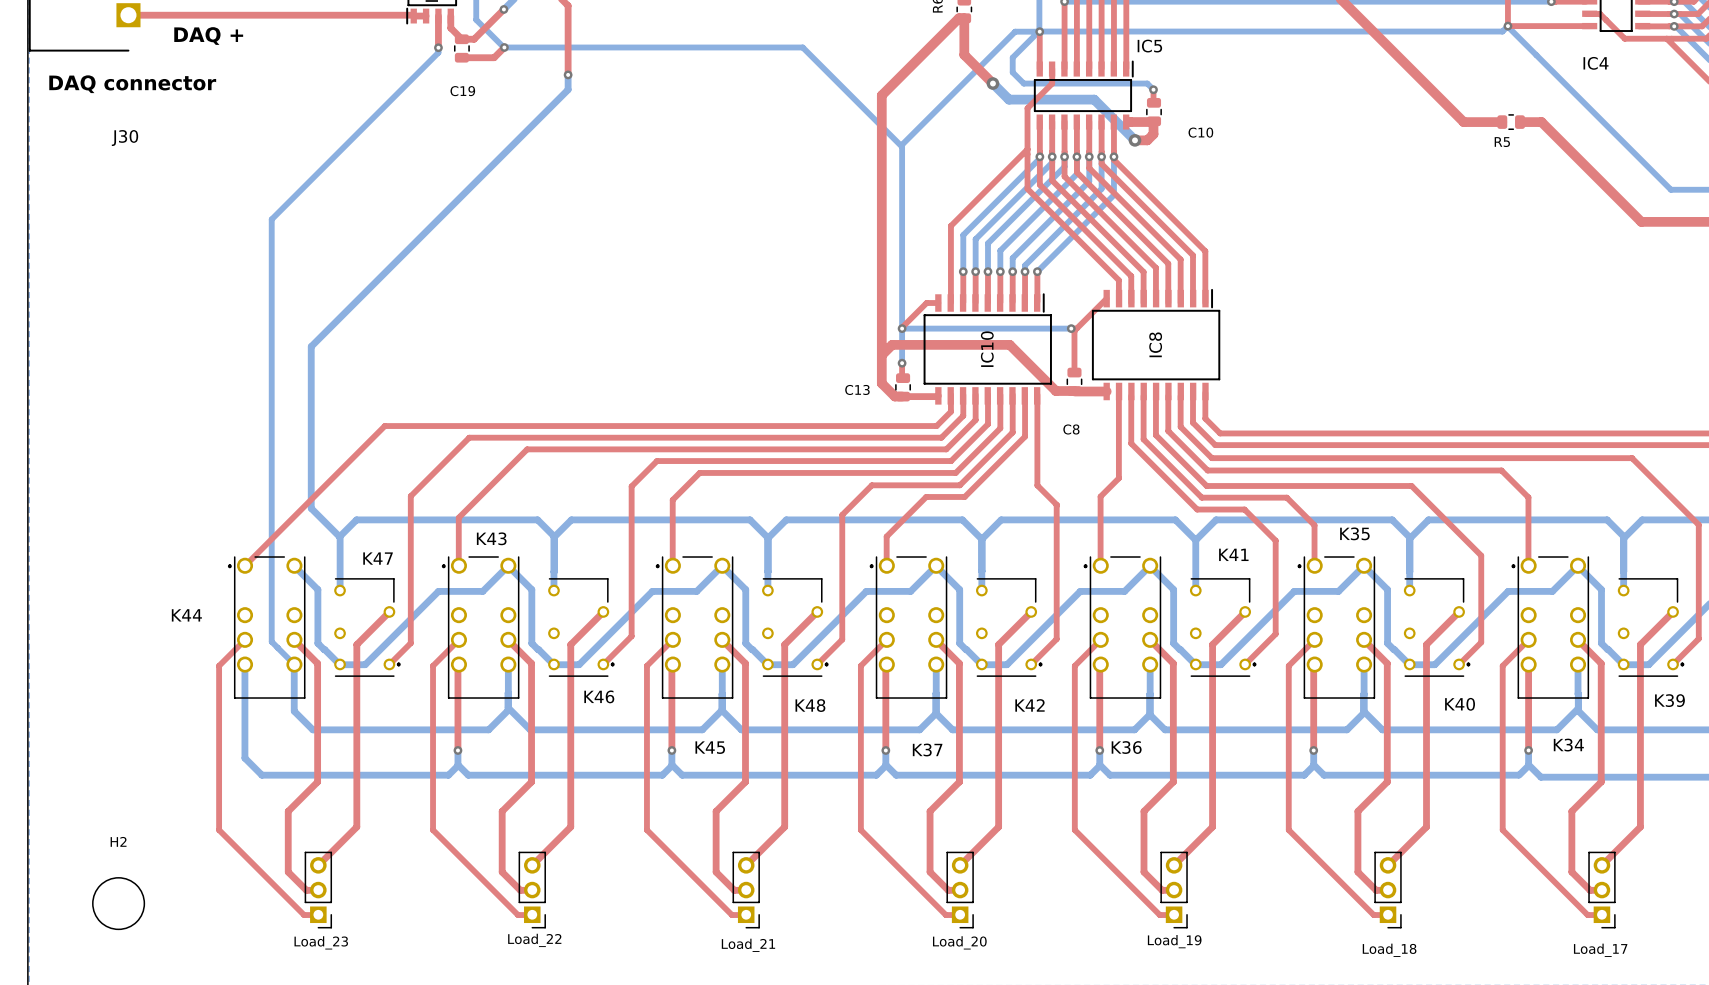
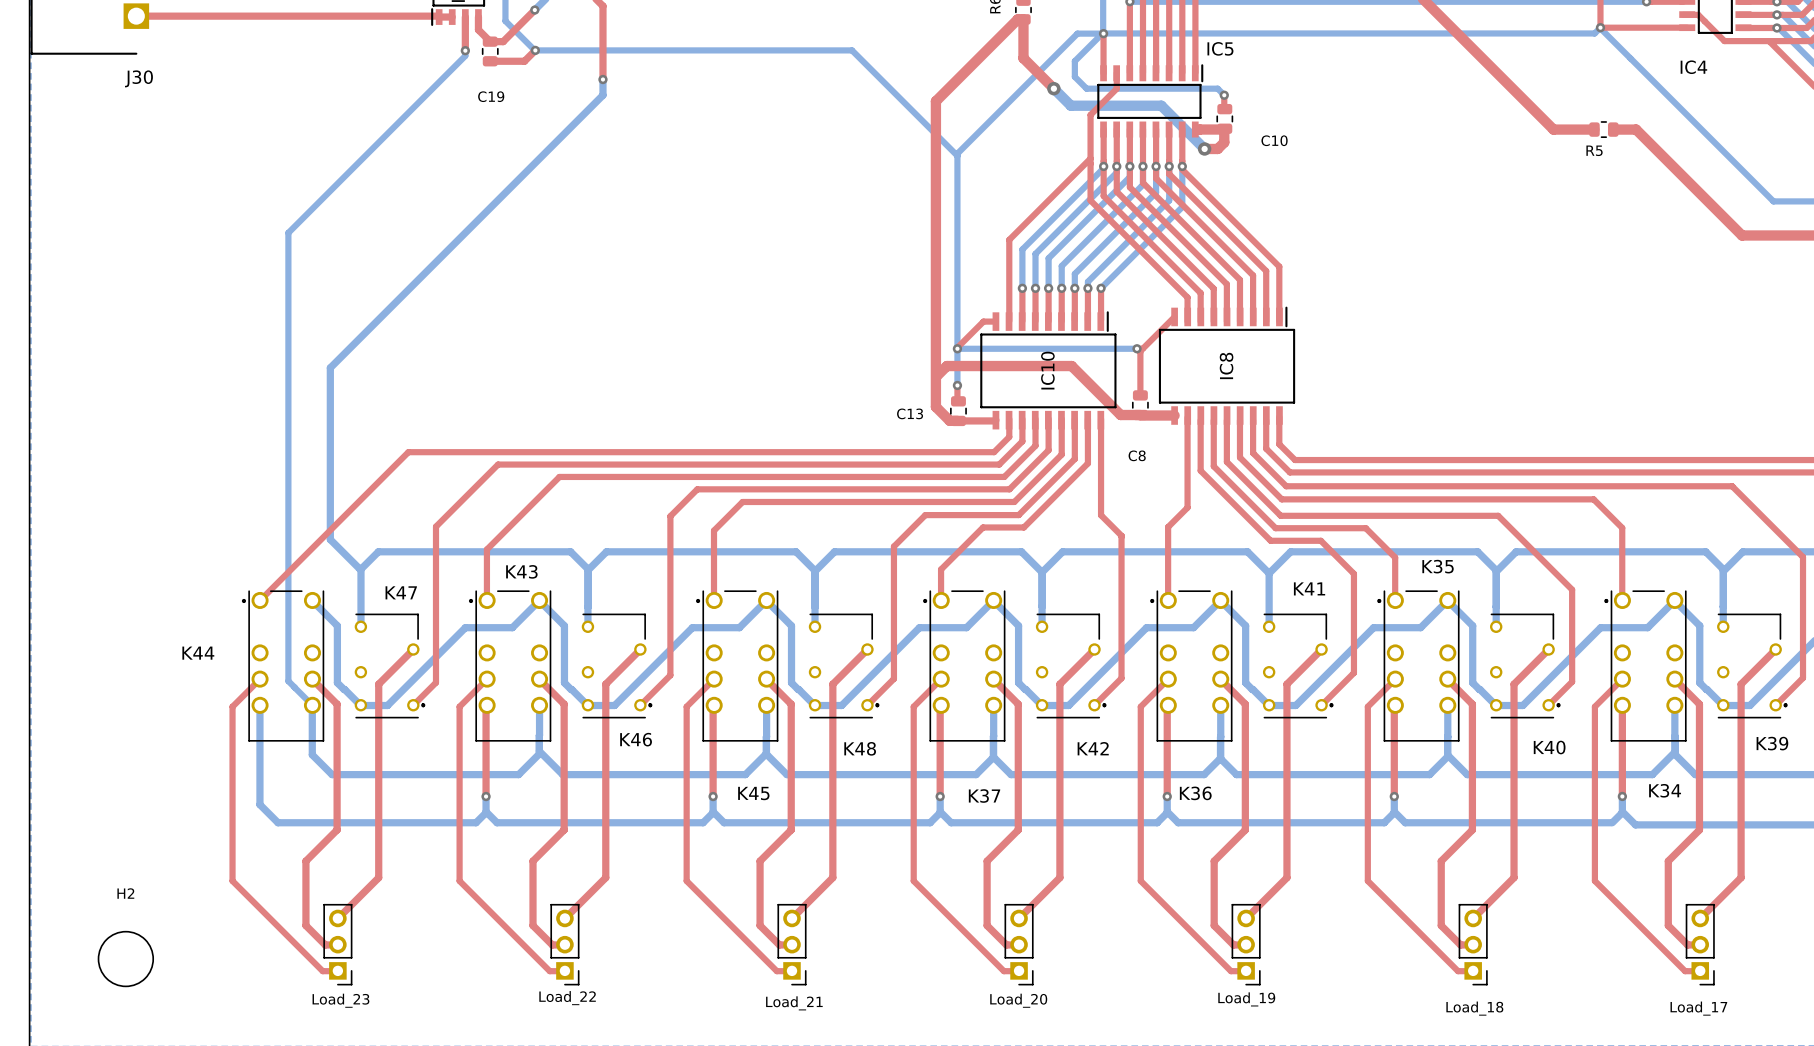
text: DAQ + (208, 36) -> none
text: DAQ connector (132, 84) -> none
J30 name position: J30 (124, 138) -> J30 (138, 78)

